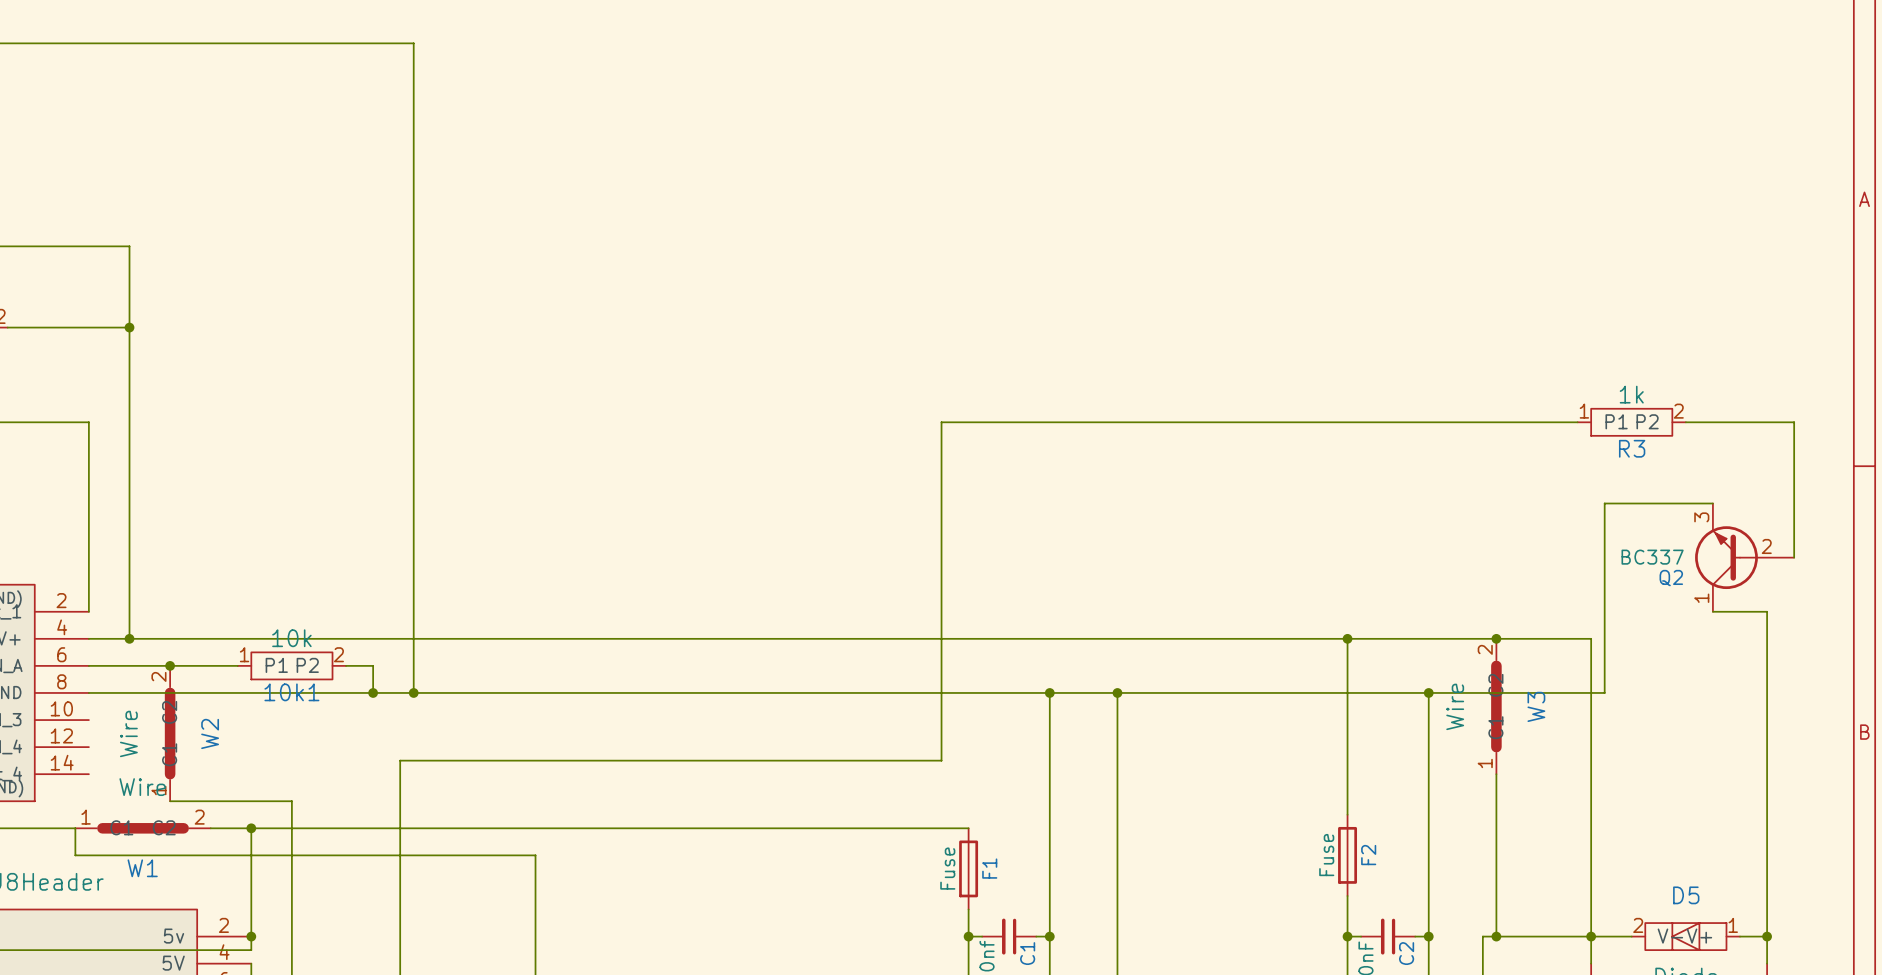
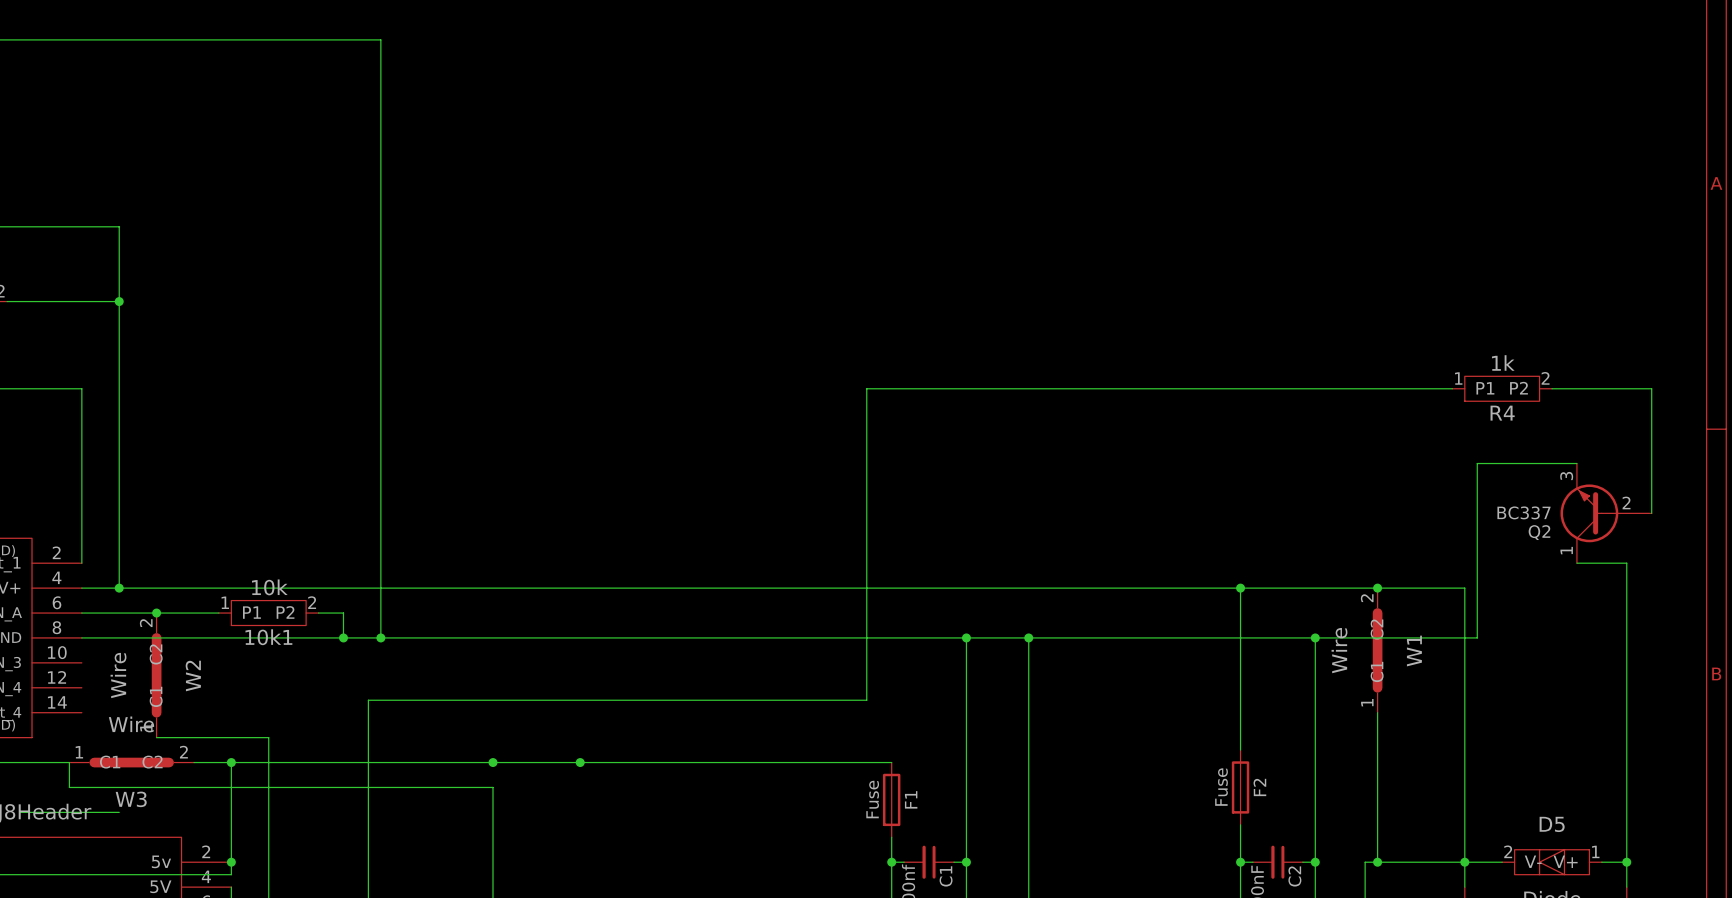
R3 name: R3 (1632, 448) -> R4 (1502, 413)
W3 name: W3 (1536, 706) -> W1 (1414, 651)
junction: none -> (493, 762)
junction: none -> (580, 762)
W1 name: W1 (142, 868) -> W3 (131, 799)
wire: none -> (19, 812) (119, 812)

